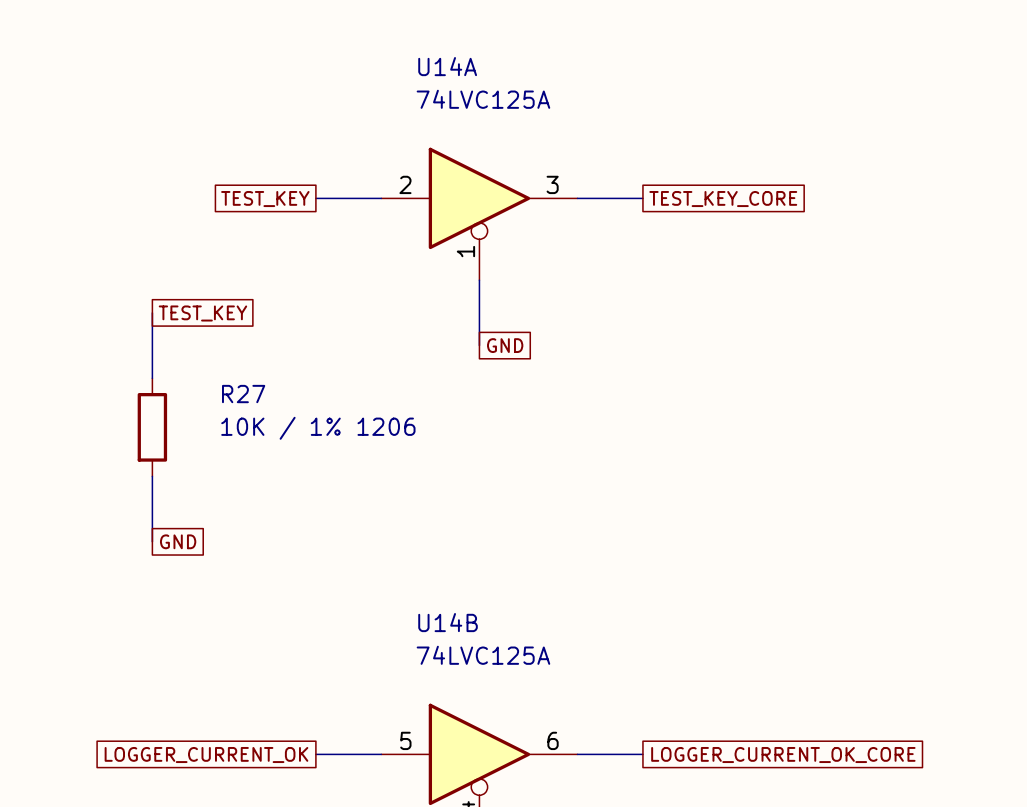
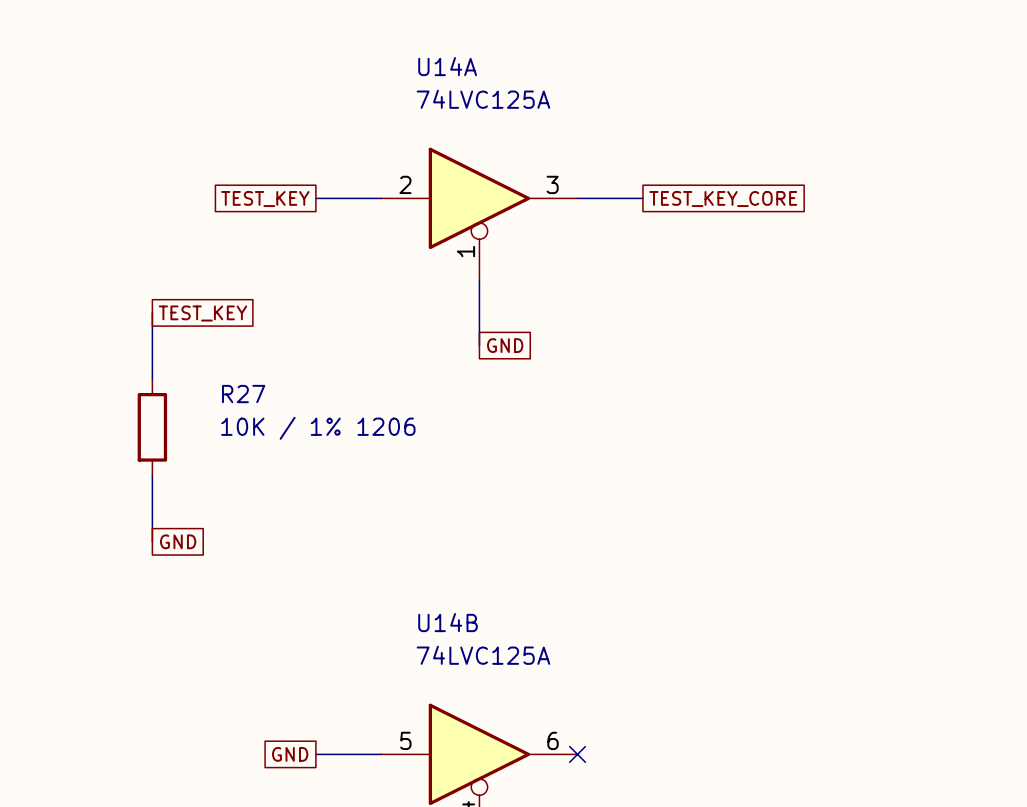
wire: (577, 754) (642, 754) -> none
no-connect mark: none -> (577, 754)
global label: LOGGER_CURRENT_OK (206, 755) -> GND (290, 754)
global label: LOGGER_CURRENT_OK_CORE (783, 755) -> none

